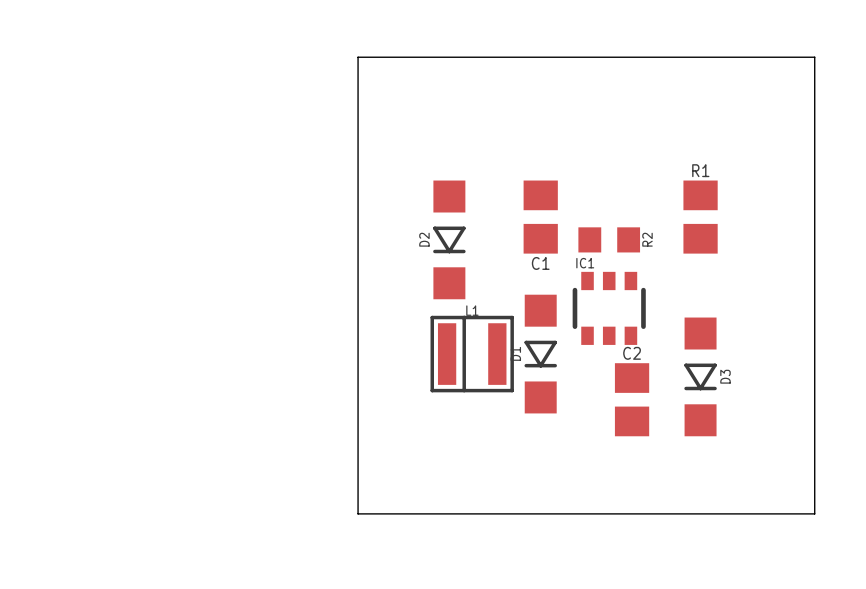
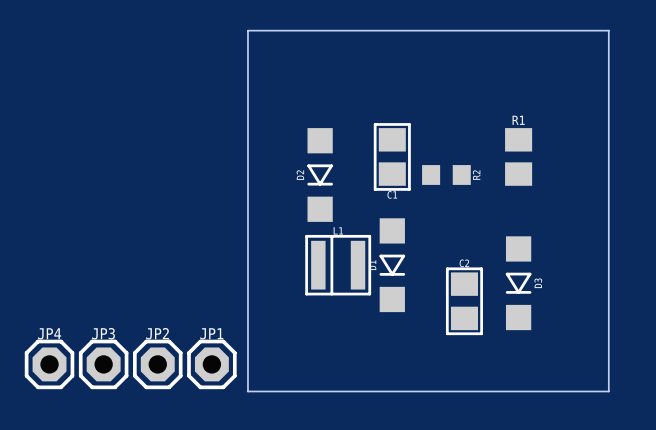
C1 footprint: [523, 180, 558, 254] -> [373, 123, 411, 191]
IC1: (609, 308) -> none
C2 footprint: [614, 363, 650, 437] -> [445, 267, 483, 336]
JP4: none -> (49, 364)
JP3: none -> (103, 364)
JP2: none -> (157, 364)
JP1: none -> (211, 364)

